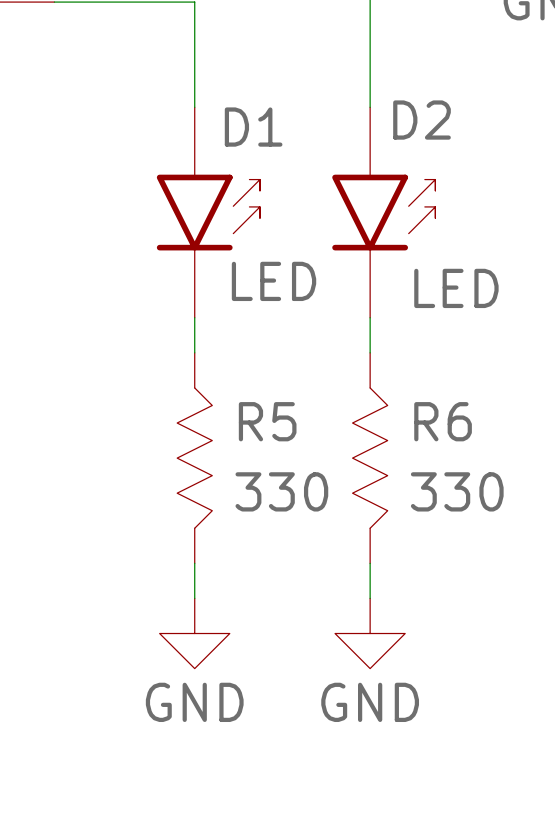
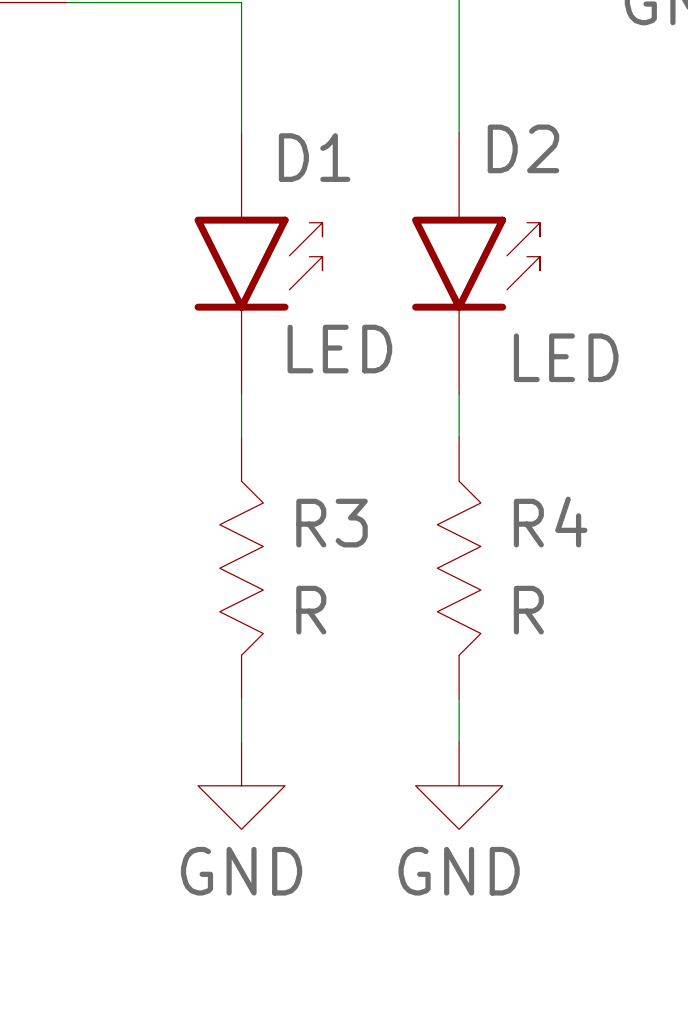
R5 name: R5 (267, 421) -> R3 (332, 523)
R6 name: R6 (443, 421) -> R4 (550, 522)
R5 value: 330 (281, 491) -> R (311, 610)
R6 value: 330 (457, 491) -> R (528, 610)

